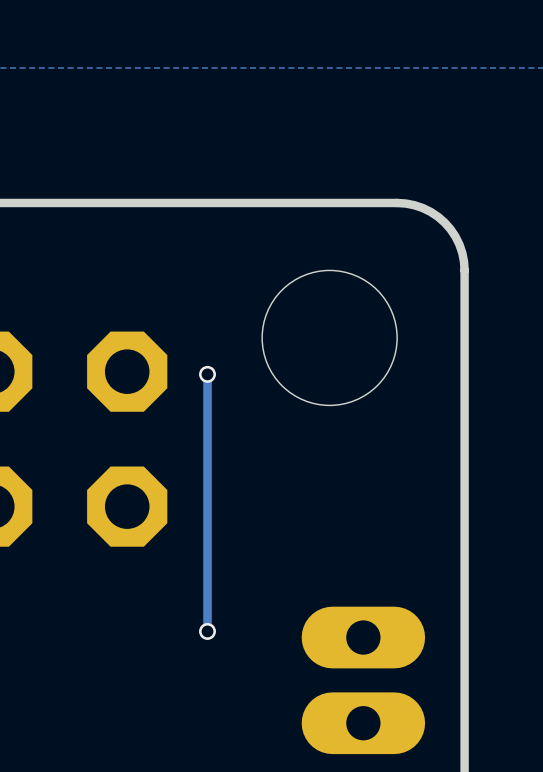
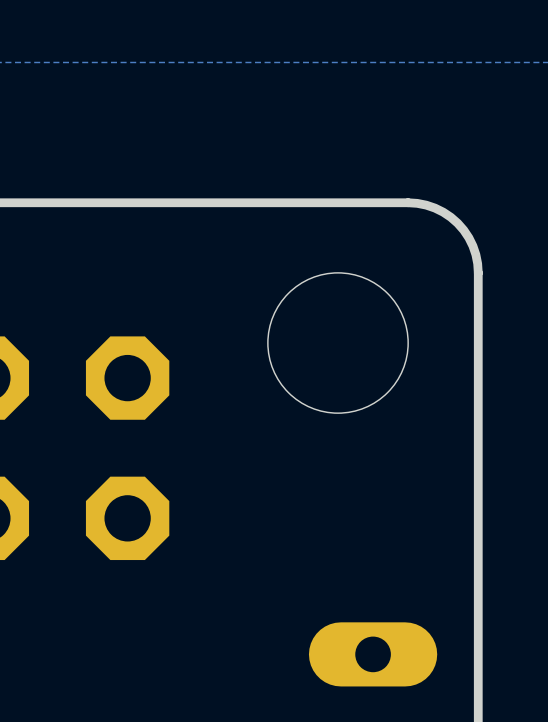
track: (207, 374) (207, 631) -> none
via: (207, 374) -> none
via: (207, 631) -> none

